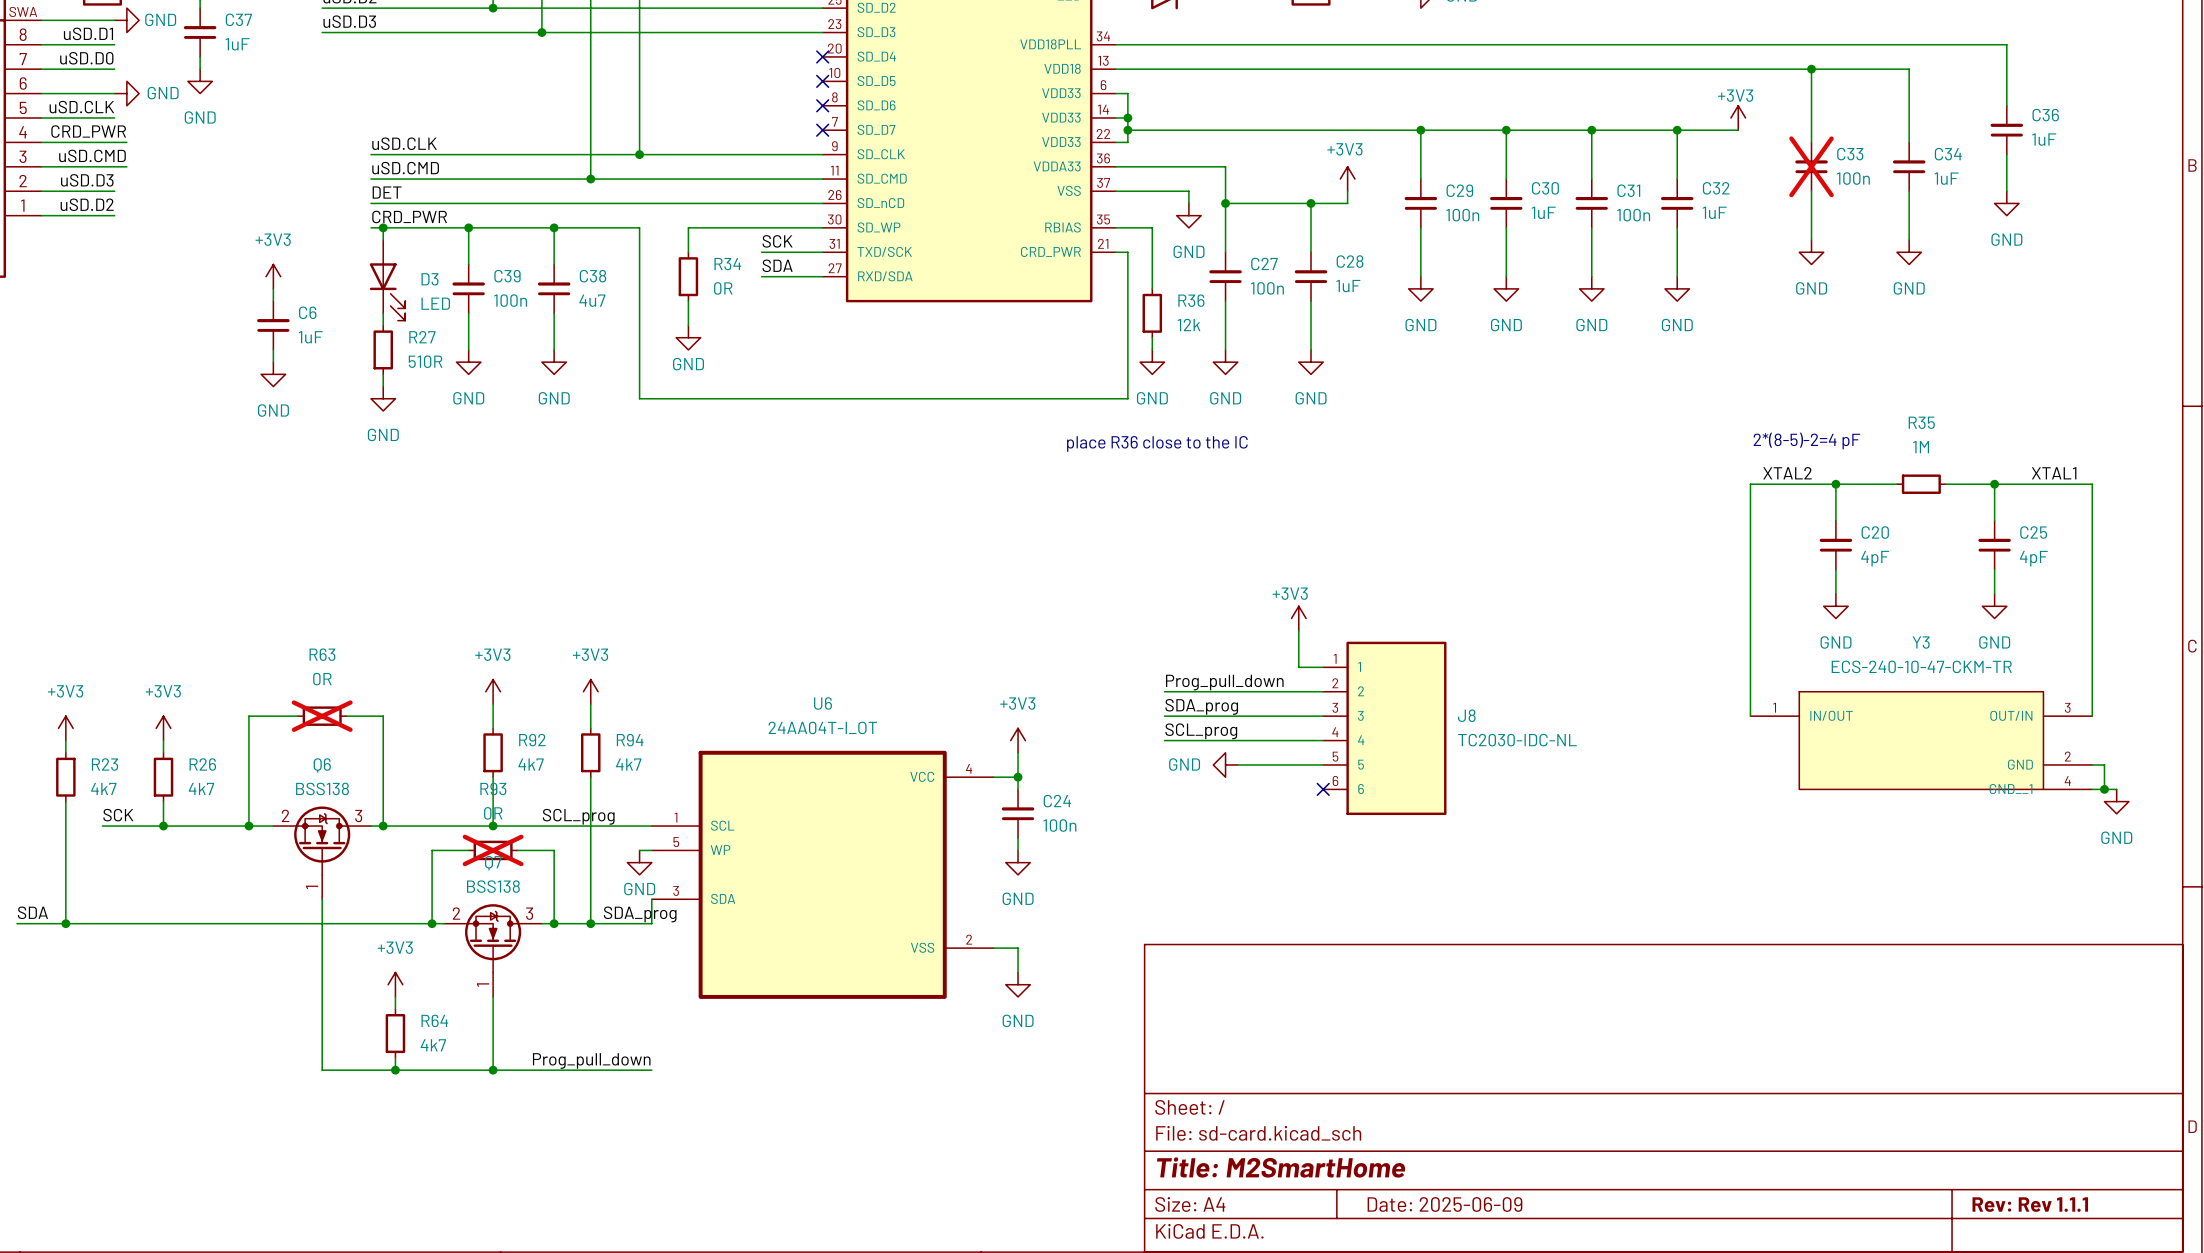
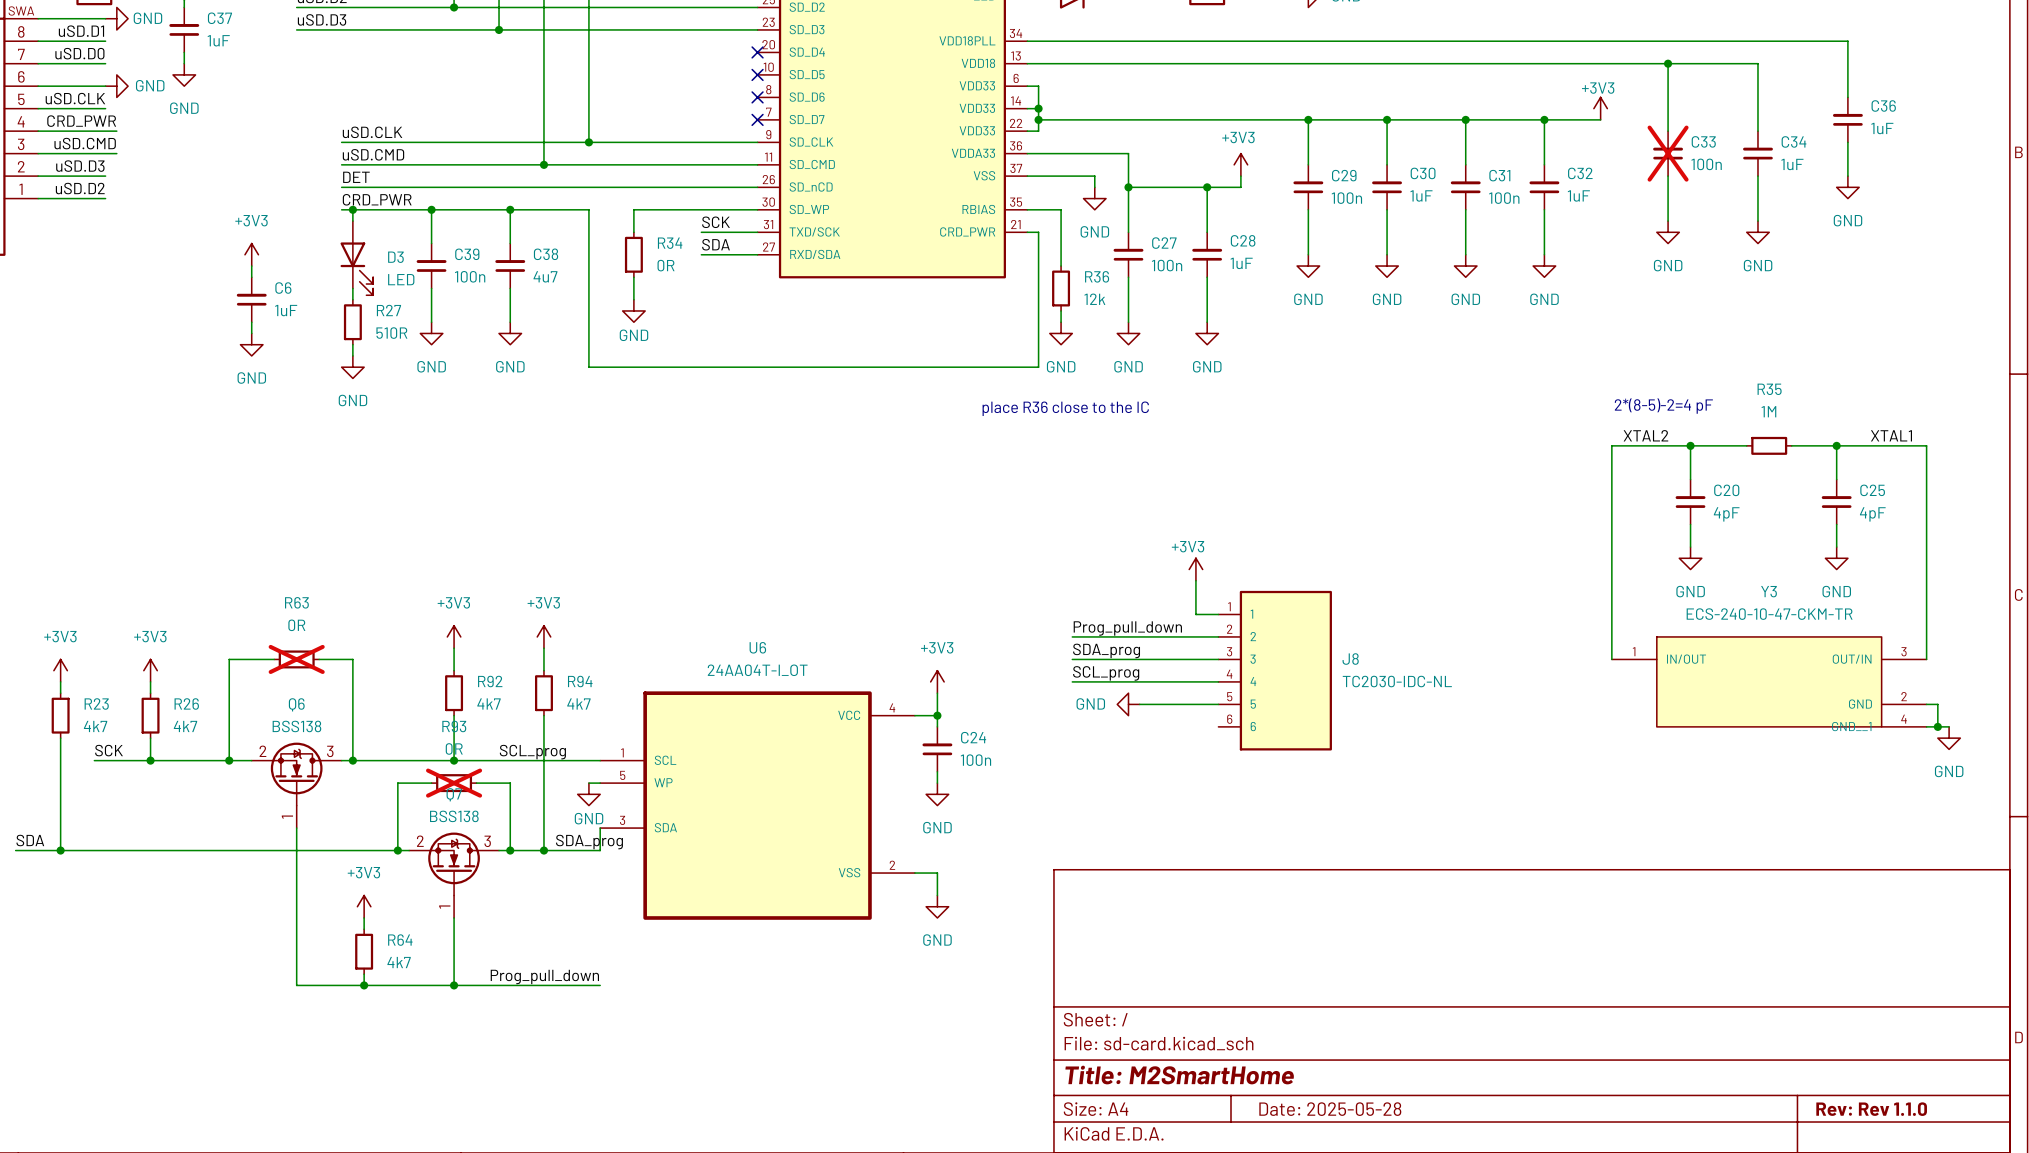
no-connect mark: (1323, 789) -> none
title block: Date: 2025-06-09 (1444, 1204) -> Date: 2025-05-28 (1330, 1109)
title block: Rev: Rev 1.1.1 (2030, 1204) -> Rev: Rev 1.1.0 (1871, 1109)

